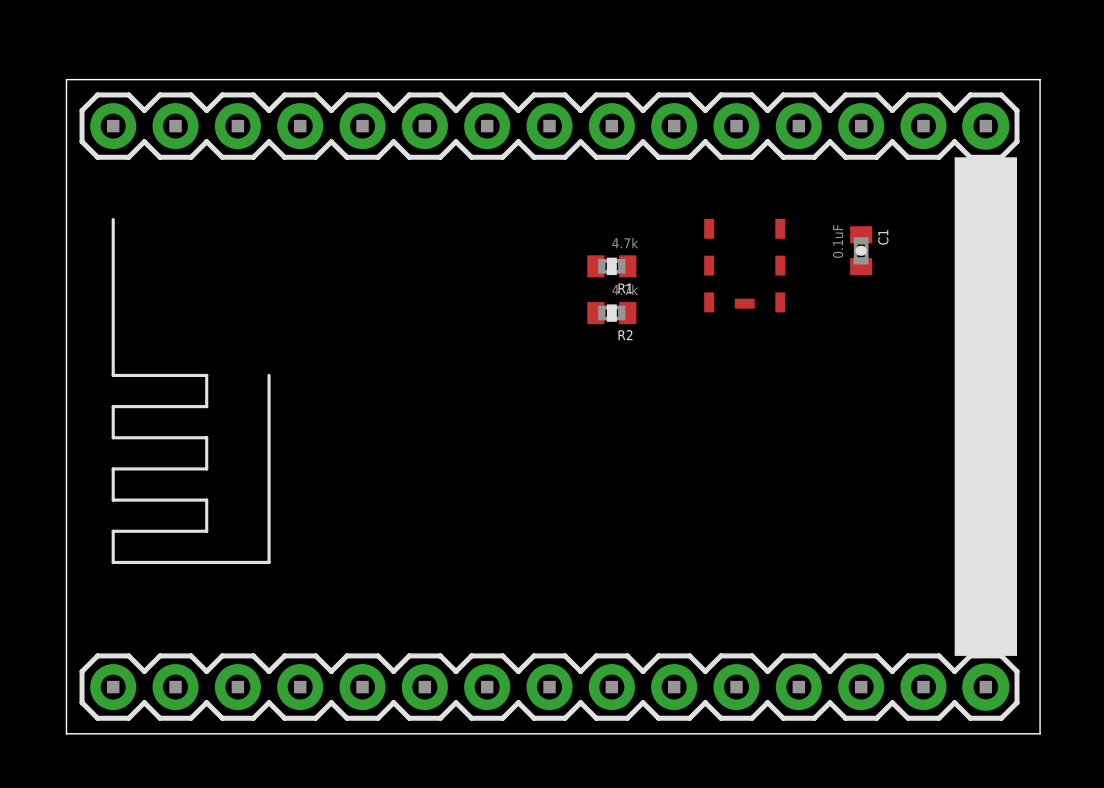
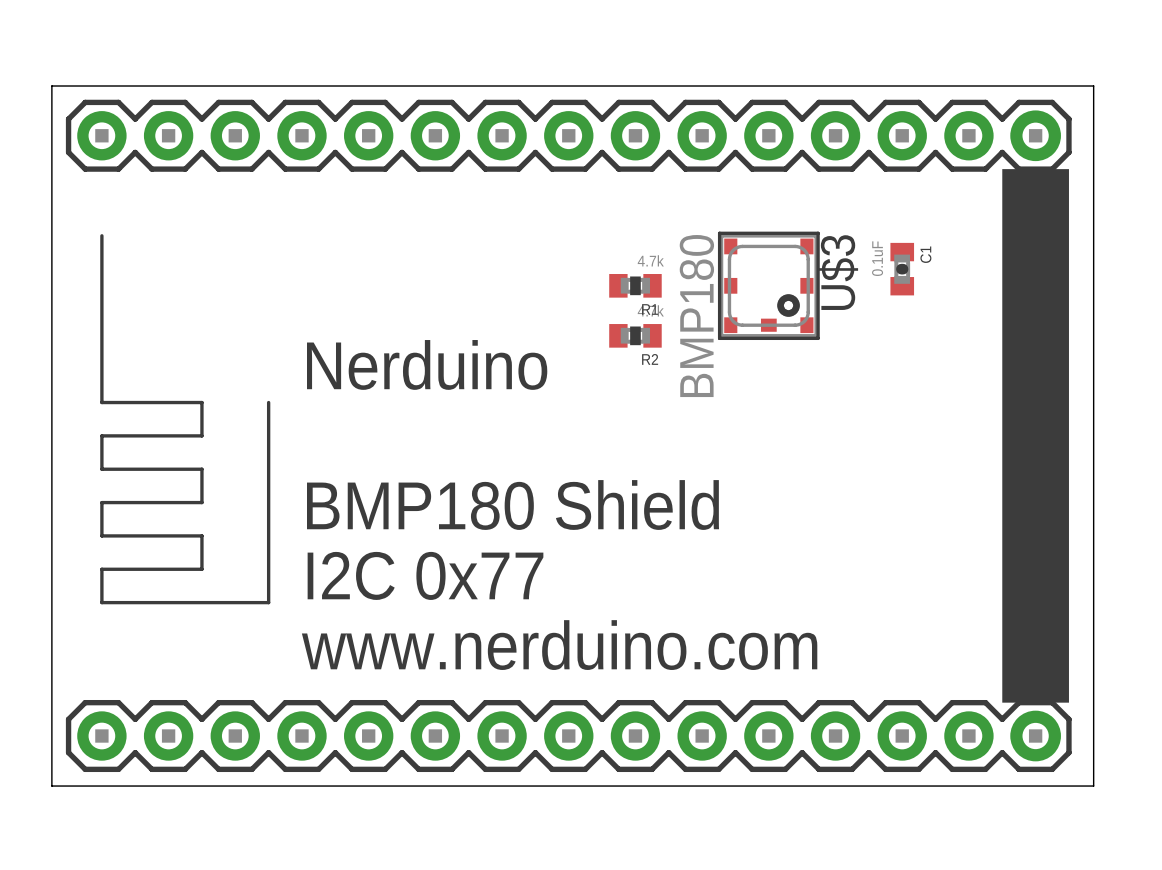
part: (744, 265) -> none
U$3: none -> BMP180 (768, 285)
text: none -> Nerduino (427, 364)
text: none -> BMP180 Shield (513, 505)
text: none -> I2C 0x77 (425, 575)
text: none -> www.nerduino.com (559, 645)

